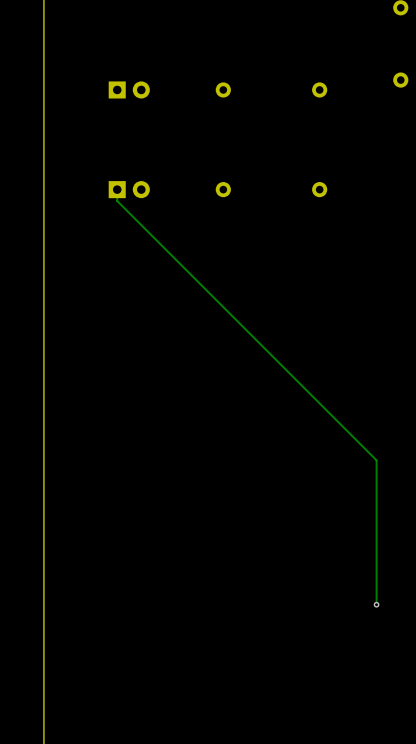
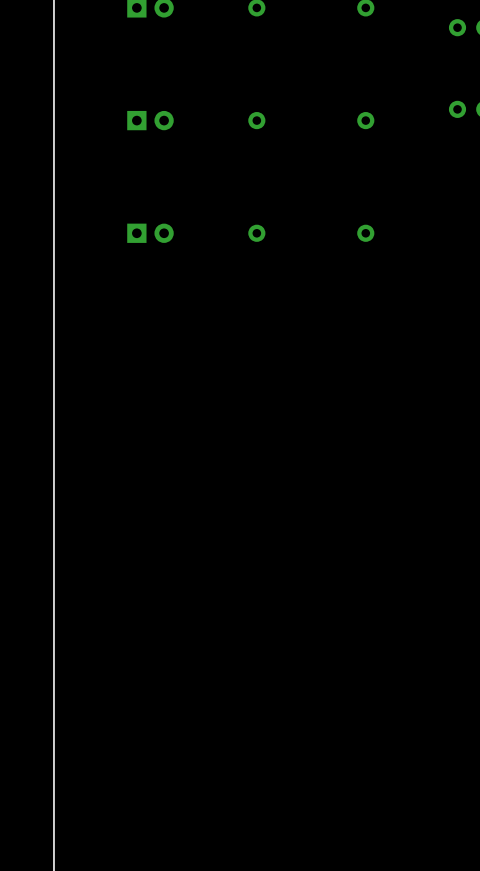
track: (117, 189) (117, 201) (376, 460) (376, 604) -> none
via: (376, 604) -> none

